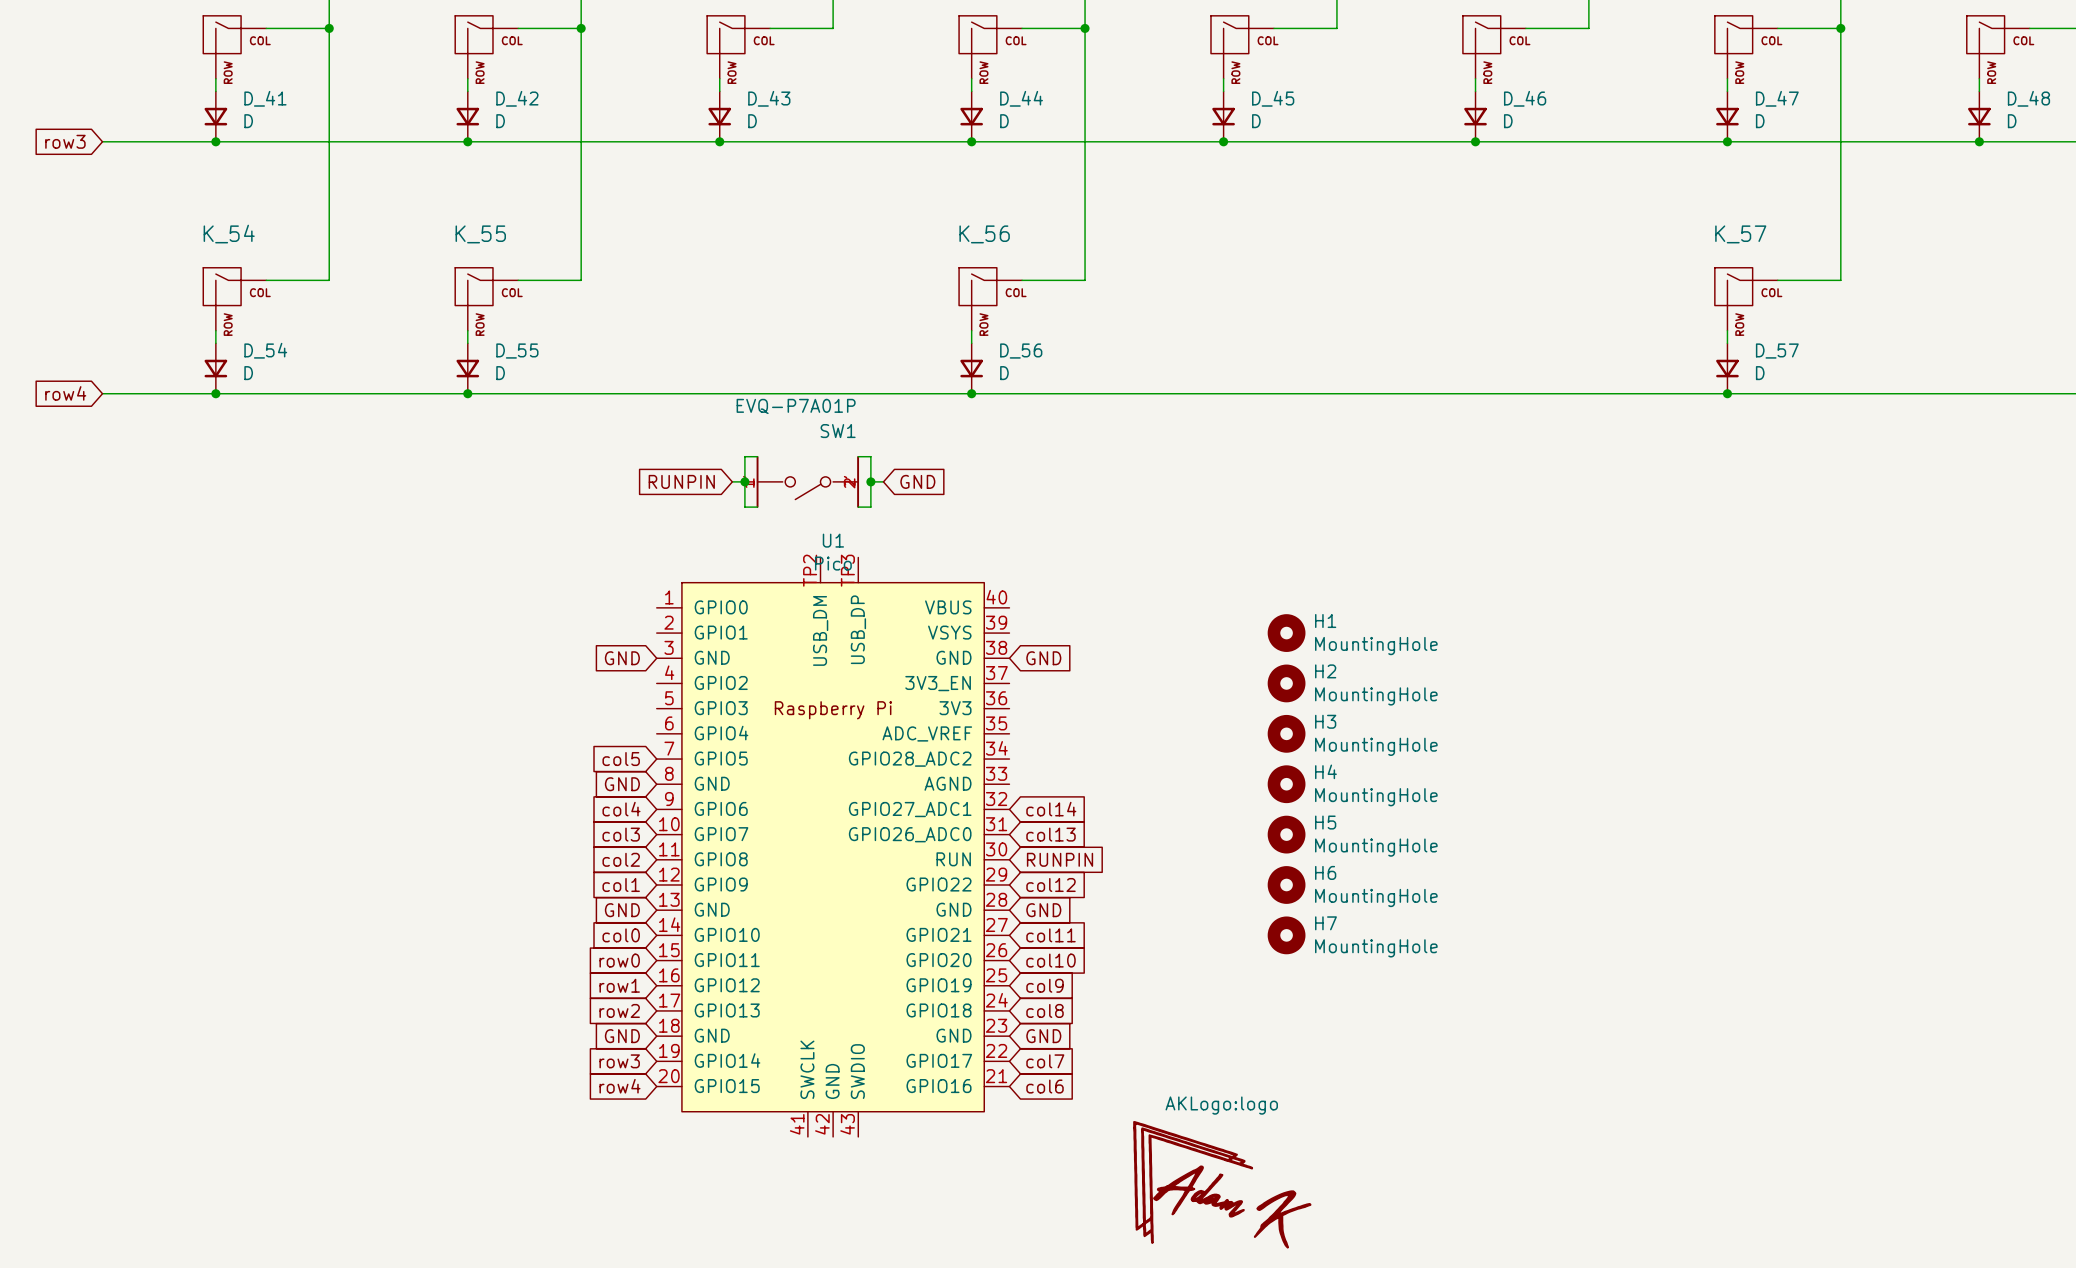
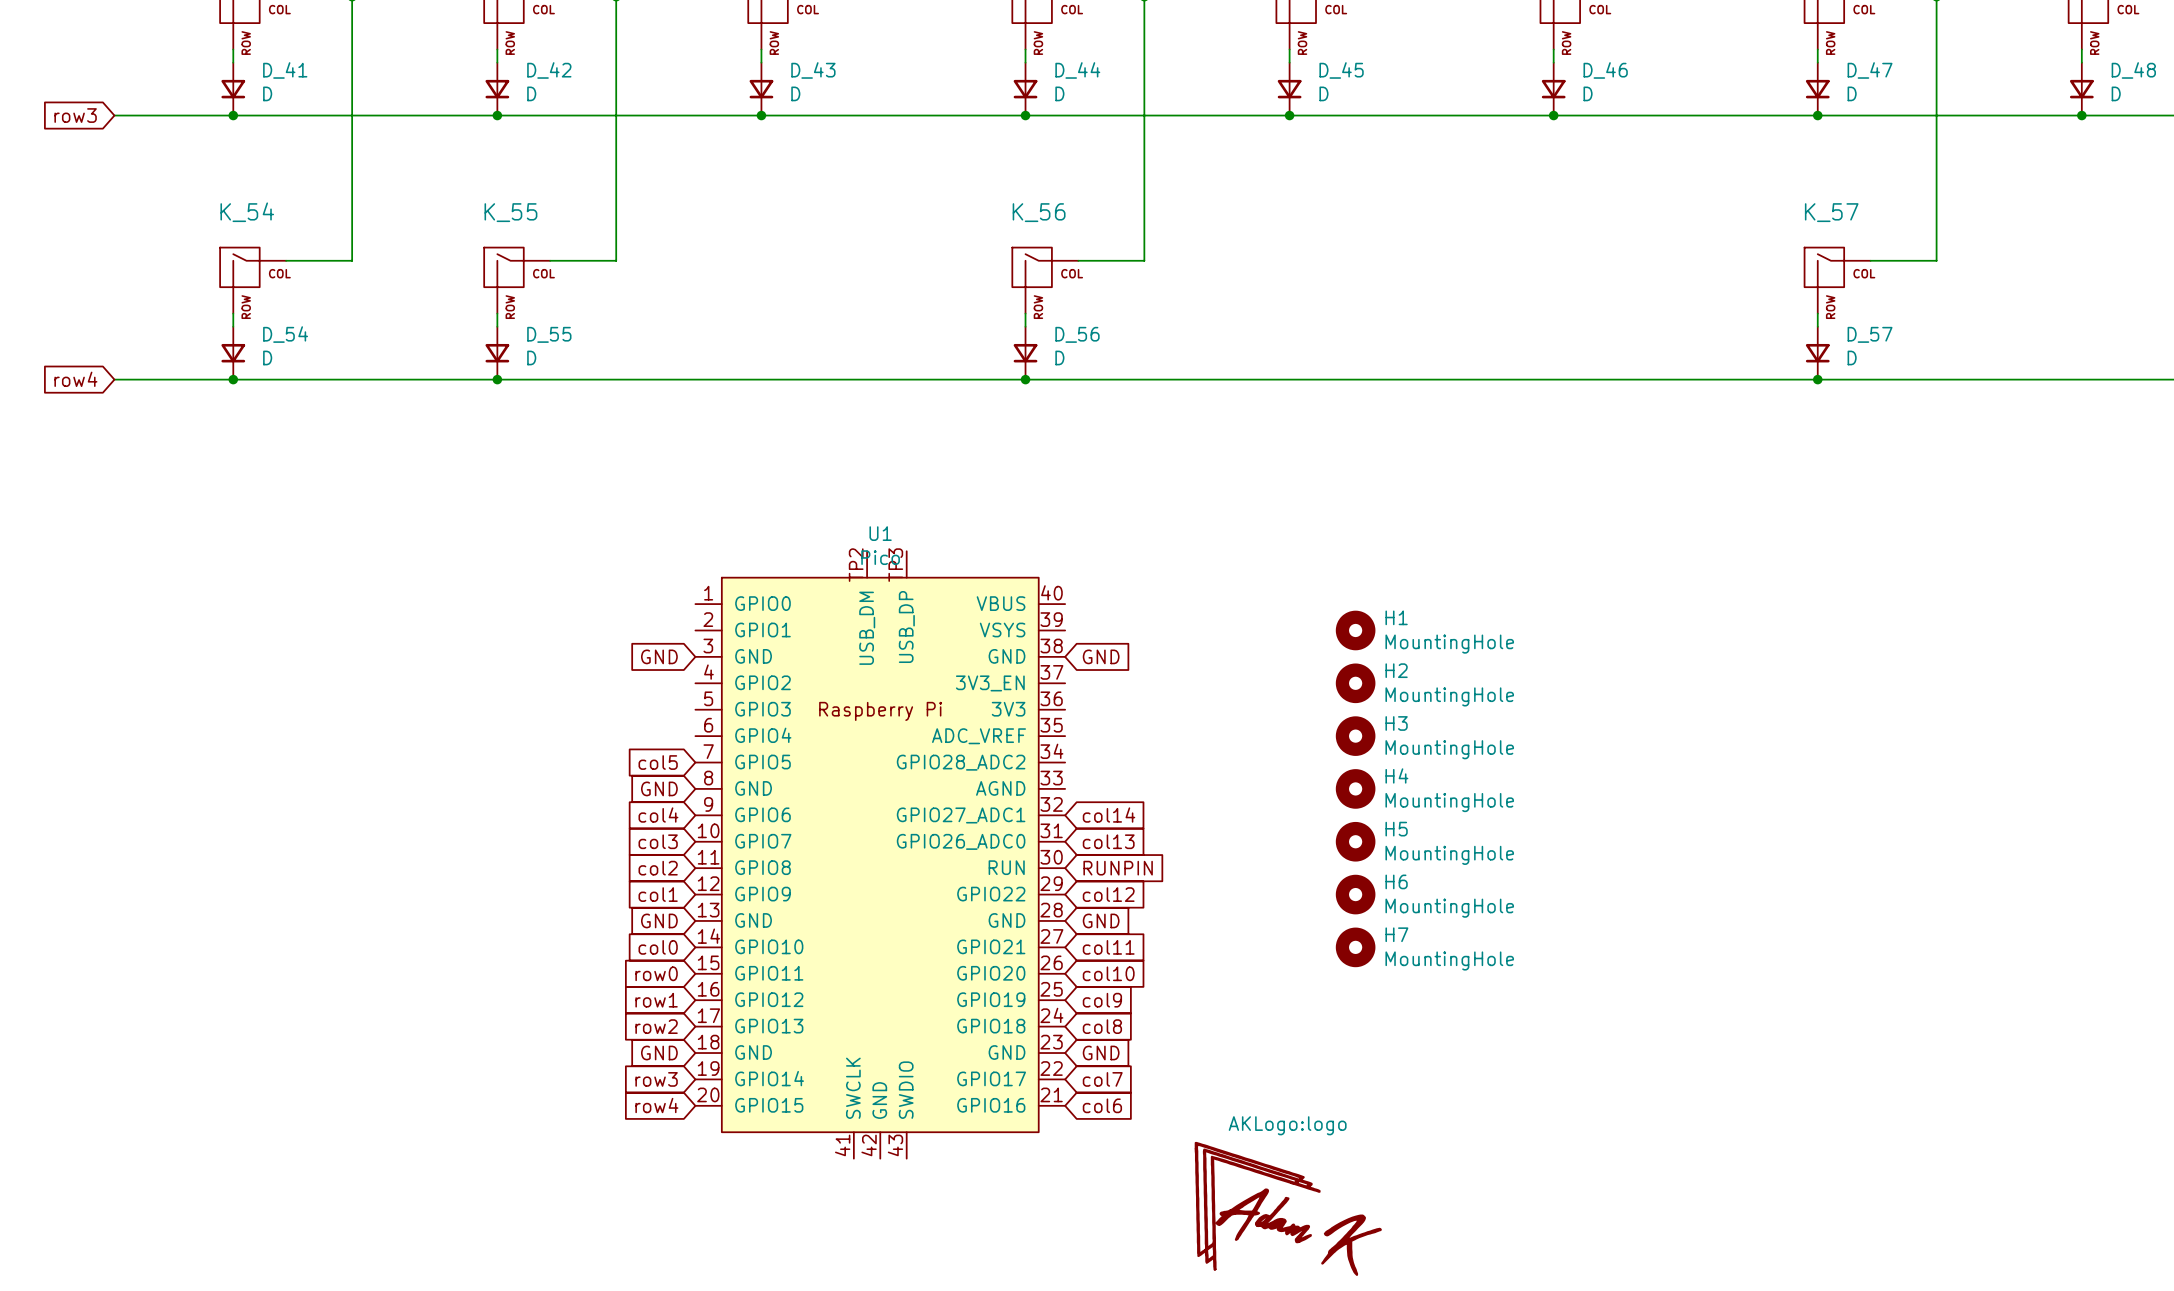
wire: (757, 456) (744, 456) (744, 507) (757, 507) -> none
wire: (858, 456) (870, 456) (870, 507) (858, 507) -> none
global label: RUNPIN (681, 481) -> none
wire: (732, 481) (744, 481) -> none
junction: (744, 481) -> none
SW1: EVQ-P7A01P (807, 481) -> none
wire: (870, 481) (883, 481) -> none
junction: (870, 481) -> none
global label: GND (917, 481) -> none

